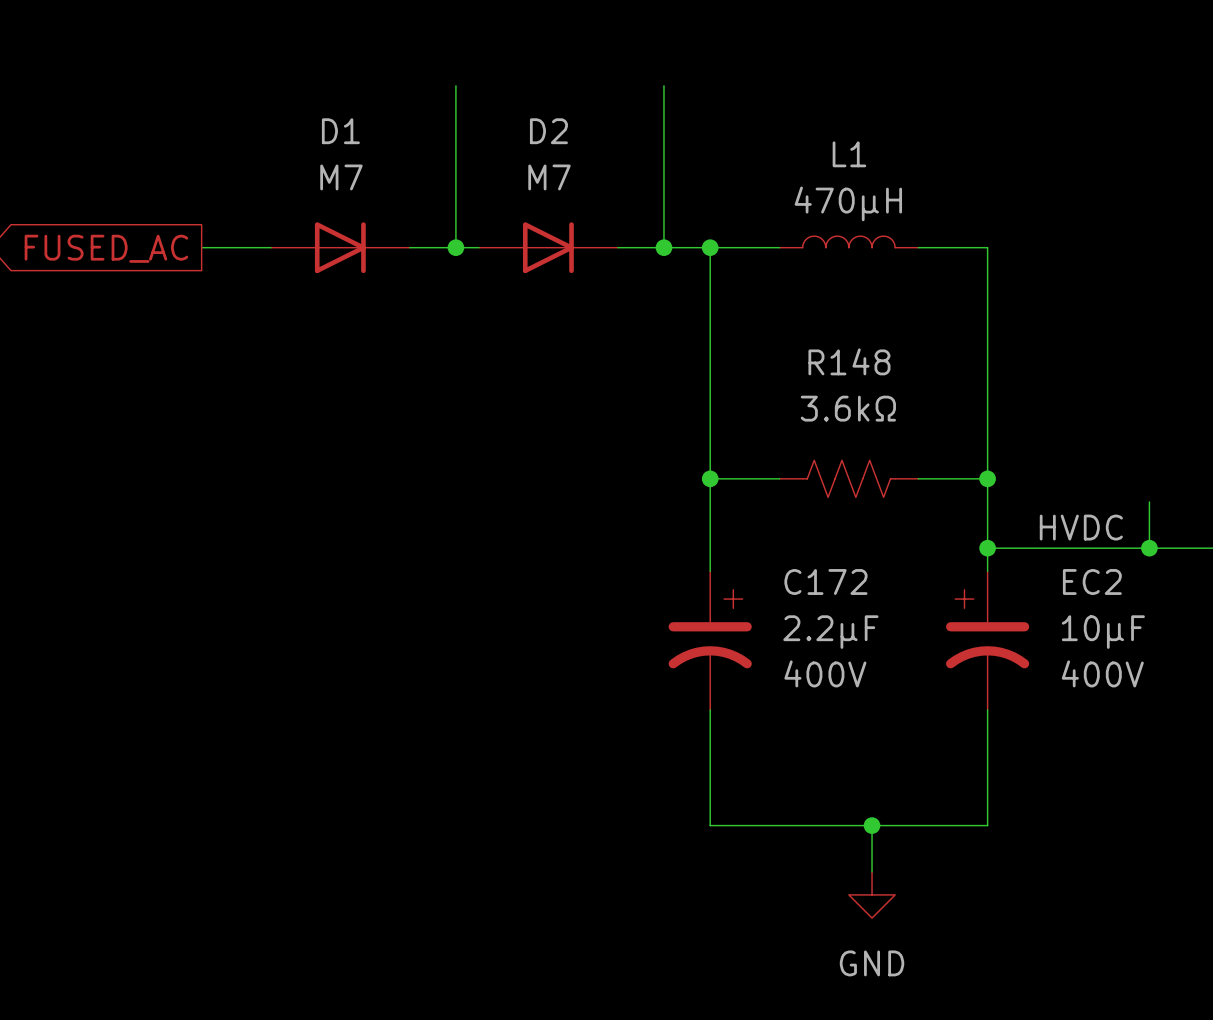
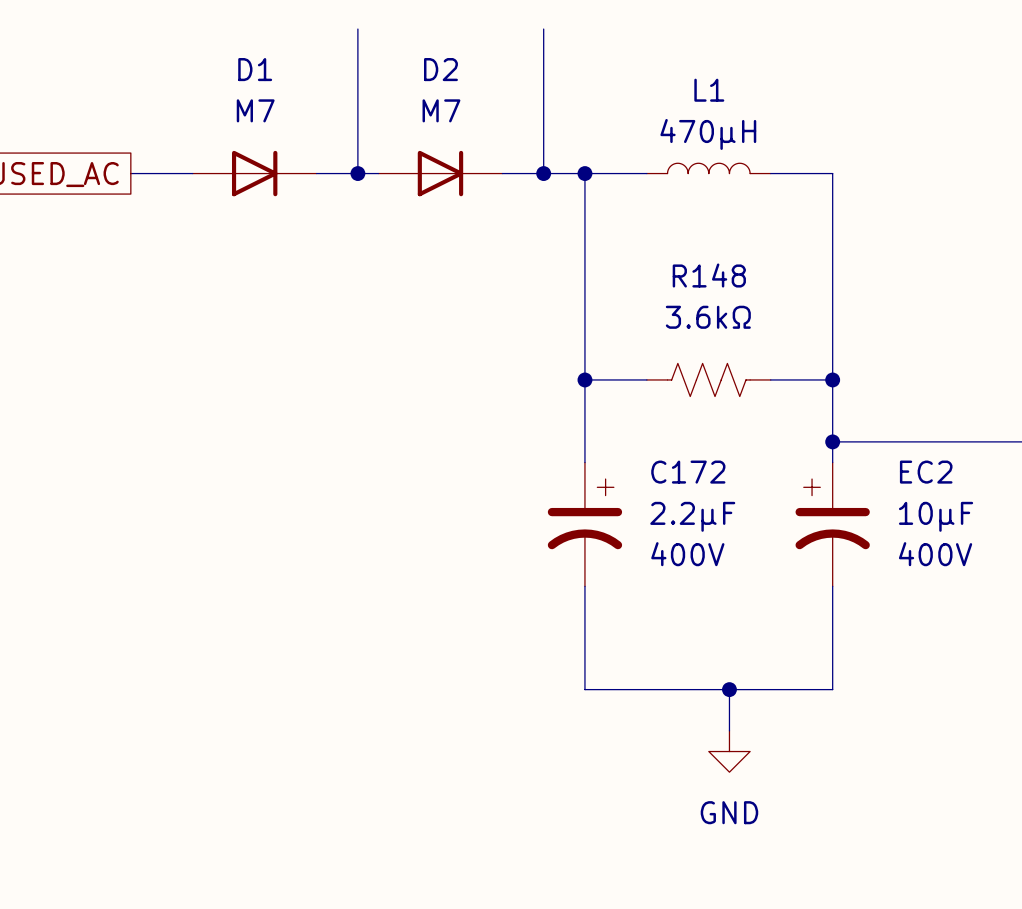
wire: (1149, 501) (1149, 548) -> none
label: HVDC (1081, 527) -> none
junction: (1149, 548) -> none

